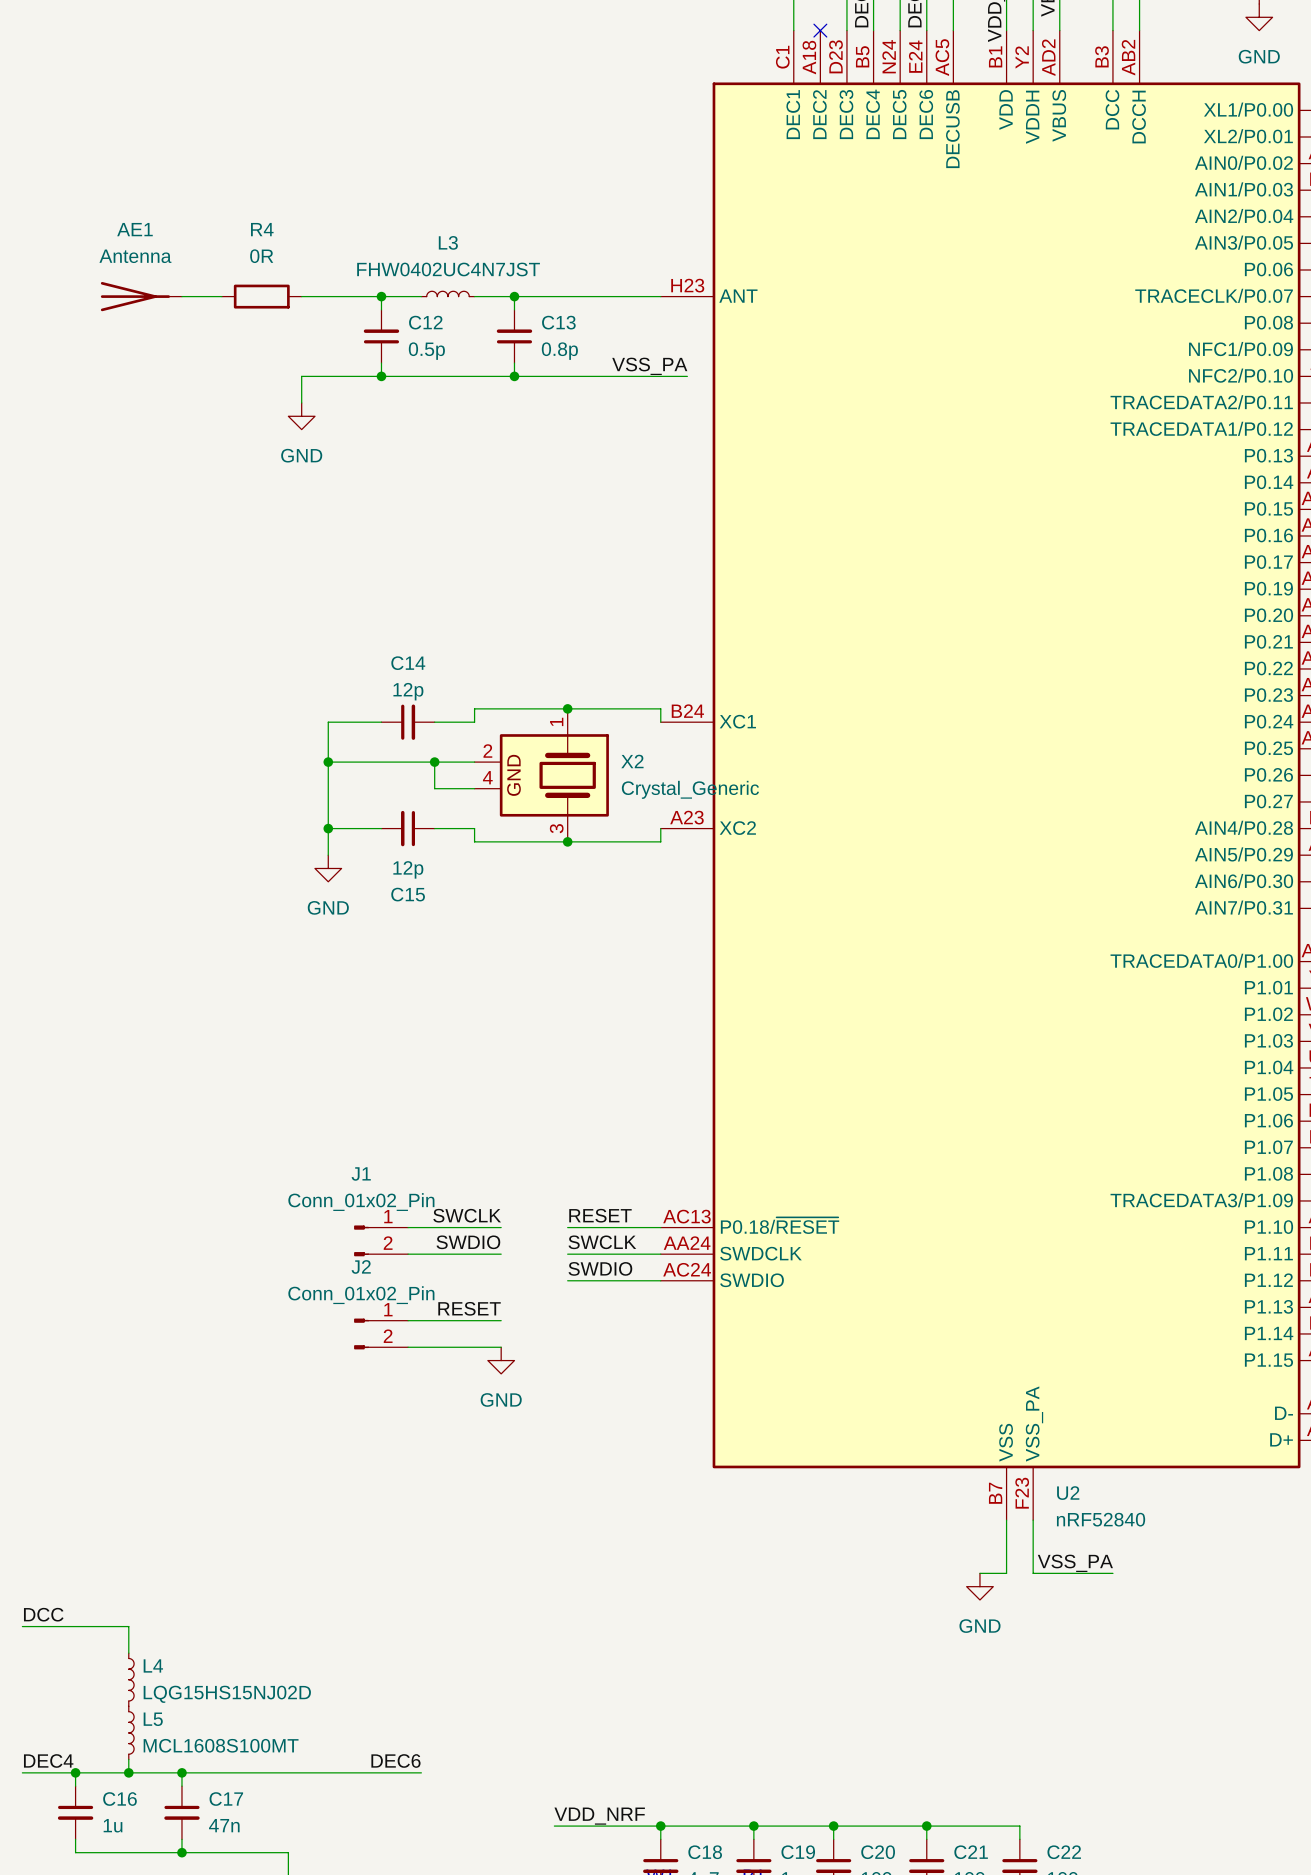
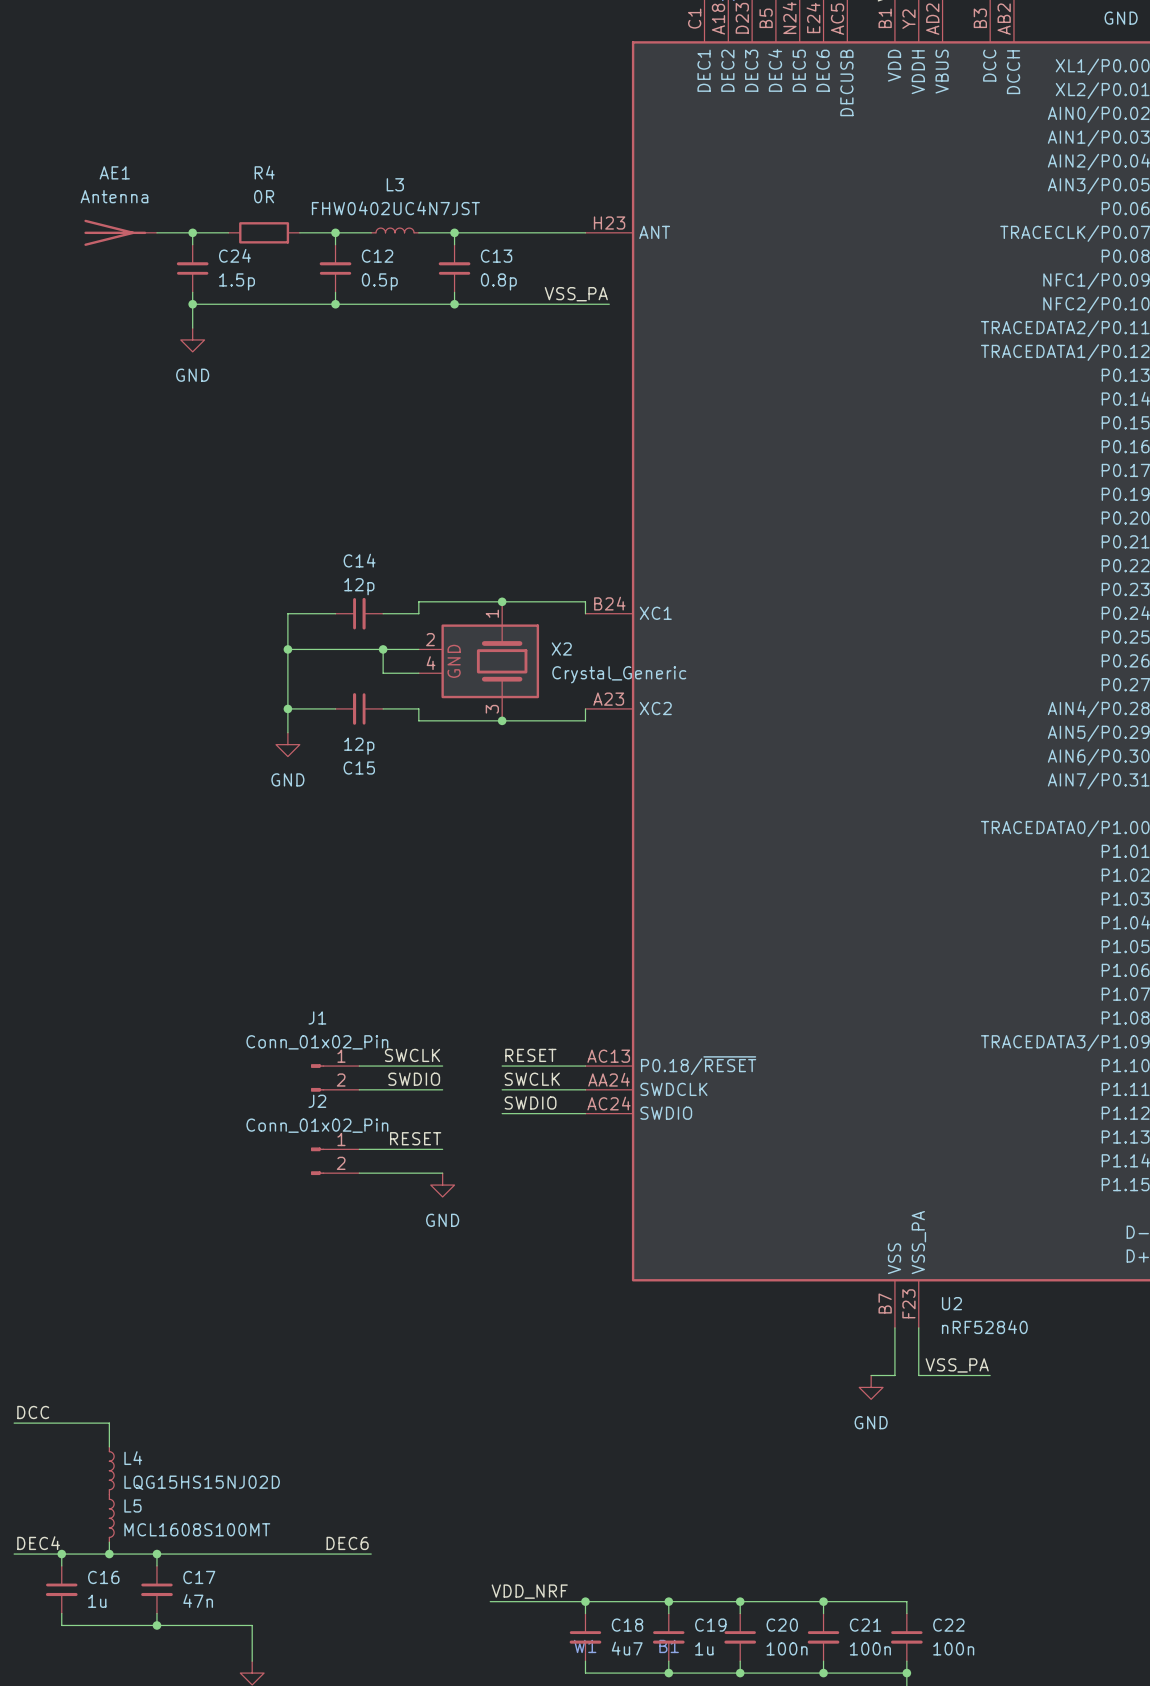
junction: none -> (192, 232)
wire: none -> (228, 232) (192, 232) (192, 244)
R4 position: (261, 296) -> (264, 232)
wire: (301, 296) (341, 296) -> none
C24: none -> 1.5p (192, 268)
wire: none -> (192, 292) (192, 328)
junction: none -> (192, 304)
wire: (301, 376) (301, 402) -> (264, 304) (192, 304)
power symbol position: GND (301, 416) -> GND (192, 339)

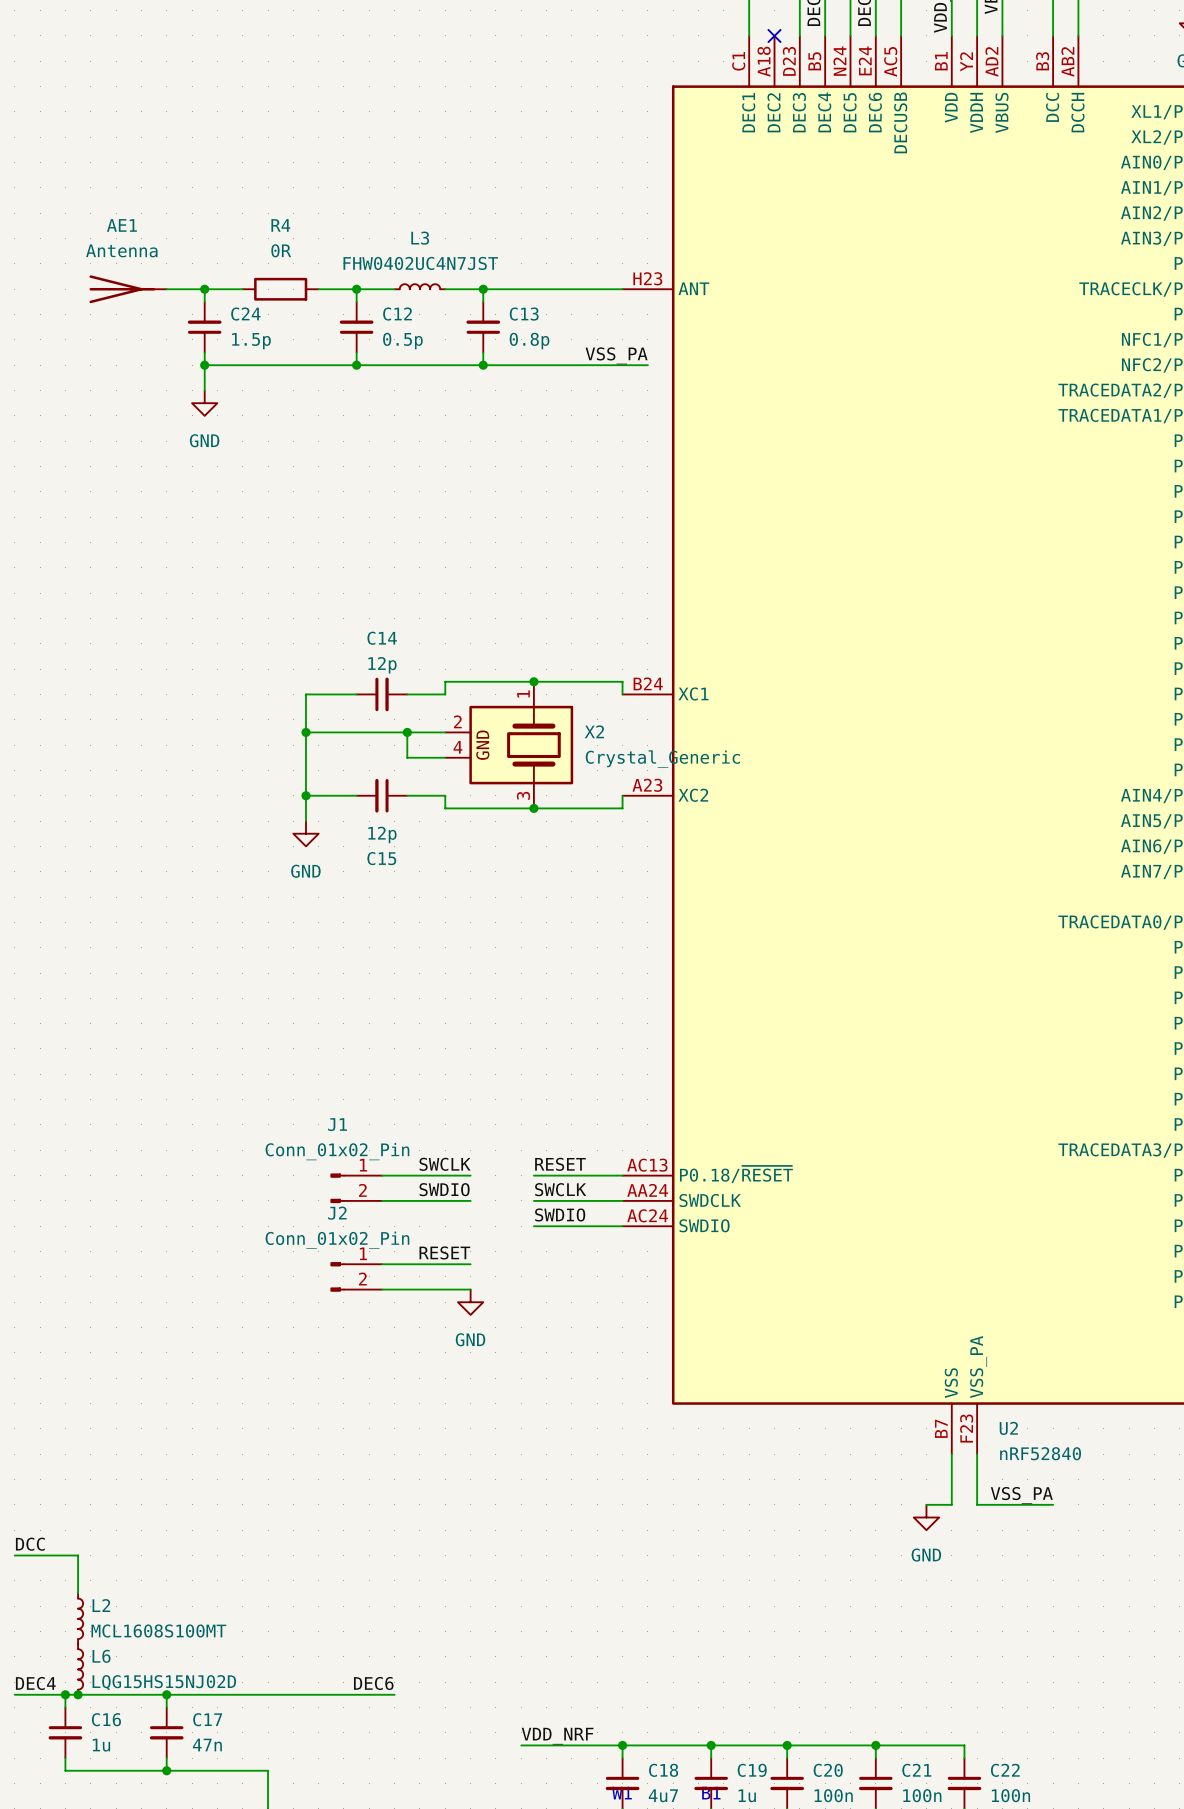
wire: (73, 1423) (109, 1423) (109, 1446) -> (78, 1555) (78, 1593)
L4: LQG15HS15NJ02D (111, 1470) -> none
L2: none -> MCL1608S100MT (80, 1618)
L5: MCL1608S100MT (111, 1518) -> none
L6: none -> LQG15HS15NJ02D (80, 1669)
wire: (109, 1542) (109, 1554) -> none
junction position: (109, 1554) -> (78, 1694)

